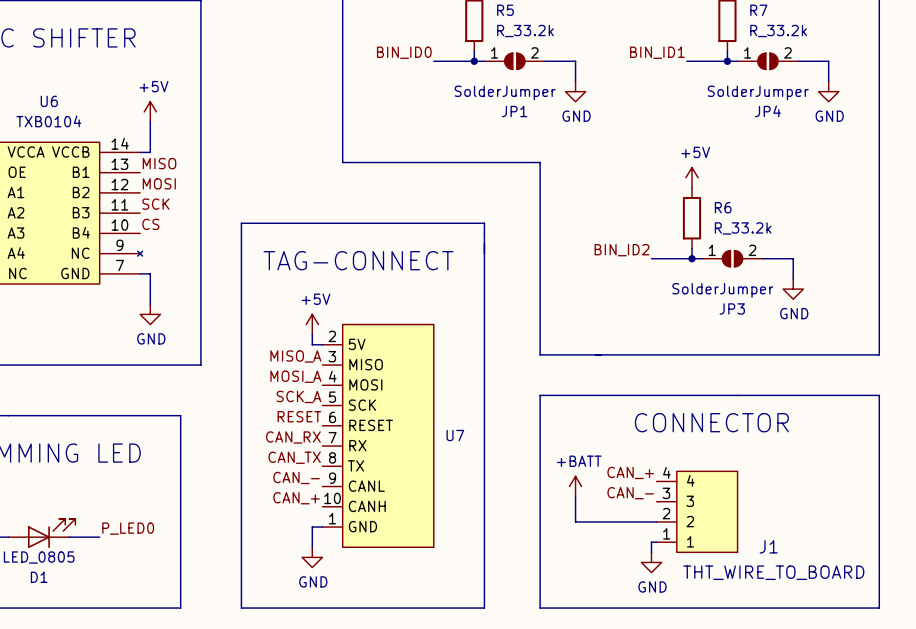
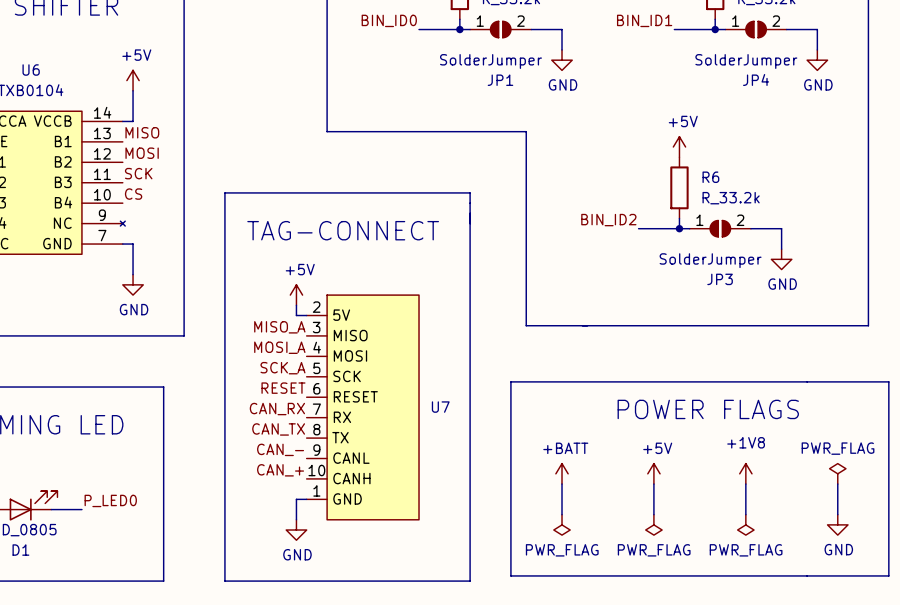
line: (540, 395) (879, 395) (879, 608) (540, 608) (540, 395) -> (510, 381) (510, 575) (888, 575) (888, 381) (510, 381)
text: CONNECTOR (711, 422) -> none
text: none -> POWER FLAGS (708, 409)
label: CAN_+ (630, 472) -> none
power symbol position: +BATT (575, 486) -> +BATT (562, 473)
label: CAN_- (630, 493) -> none
power symbol: none -> +5V (653, 473)
power symbol: none -> +1V8 (745, 473)
power symbol: none -> PWR_FLAG (837, 473)
J1: THT_WIRE_TO_BOARD (697, 511) -> none
wire: none -> (745, 484) (745, 514)
wire: none -> (837, 484) (837, 514)
wire: (575, 521) (656, 521) -> (562, 494) (562, 514)
wire: (656, 542) (651, 542) (651, 552) -> none
power symbol: none -> PWR_FLAG (562, 524)
power symbol: none -> PWR_FLAG (653, 524)
power symbol: none -> PWR_FLAG (745, 524)
power symbol position: GND (651, 562) -> GND (837, 524)

